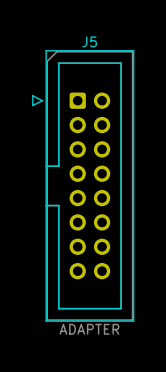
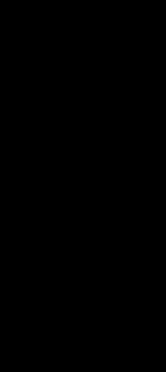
J5: ADAPTER (83, 185) -> none

